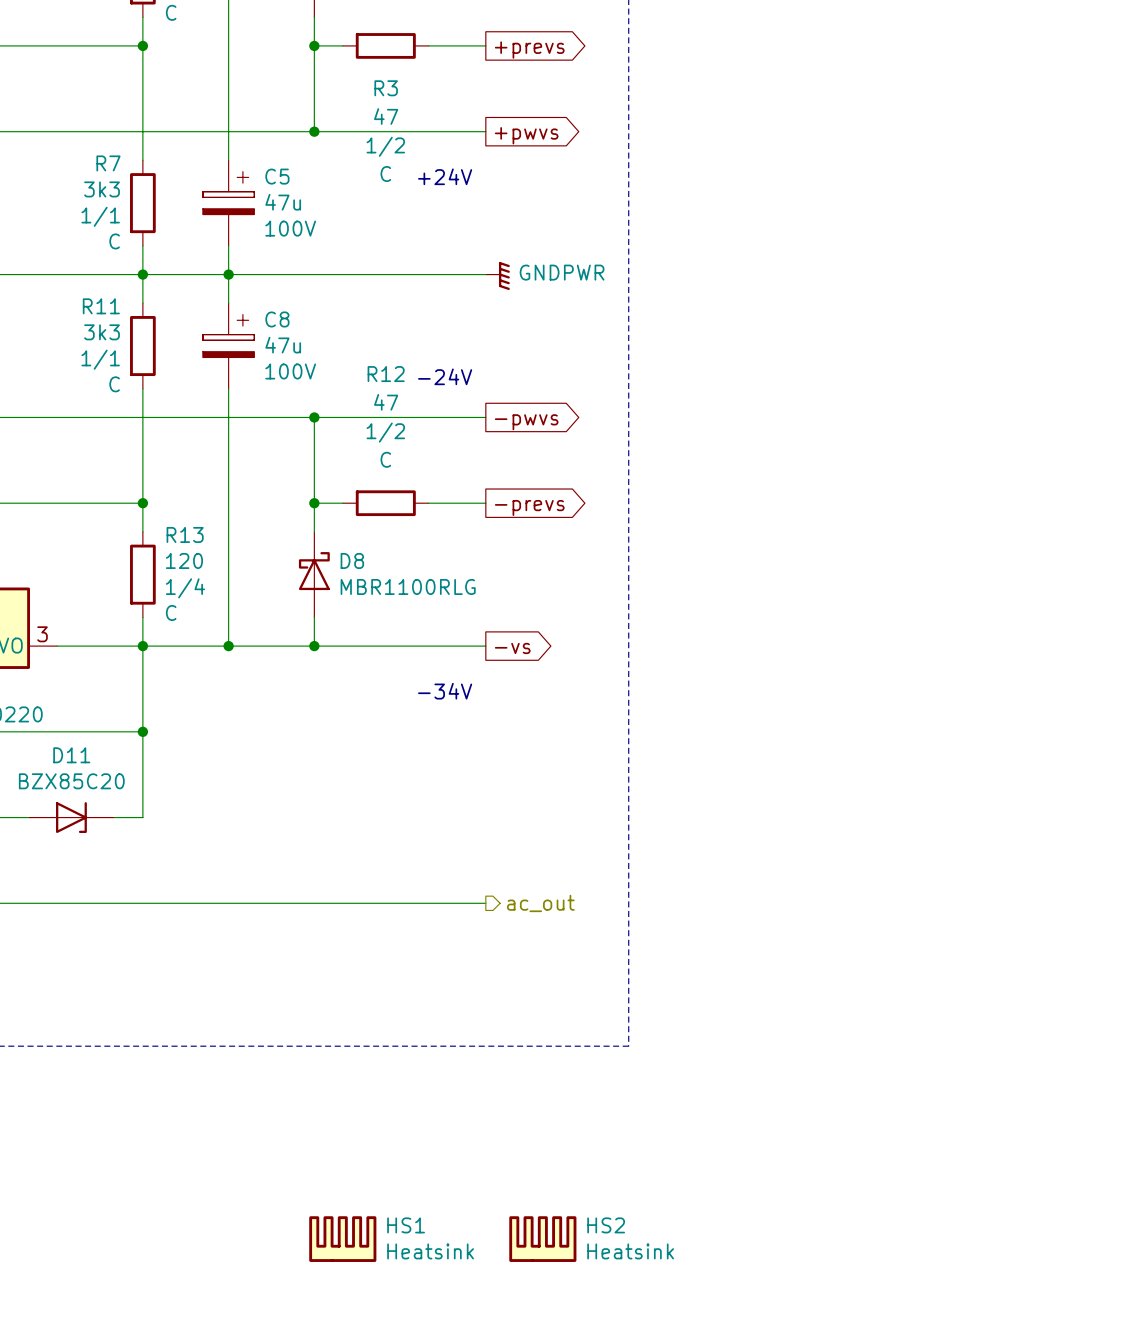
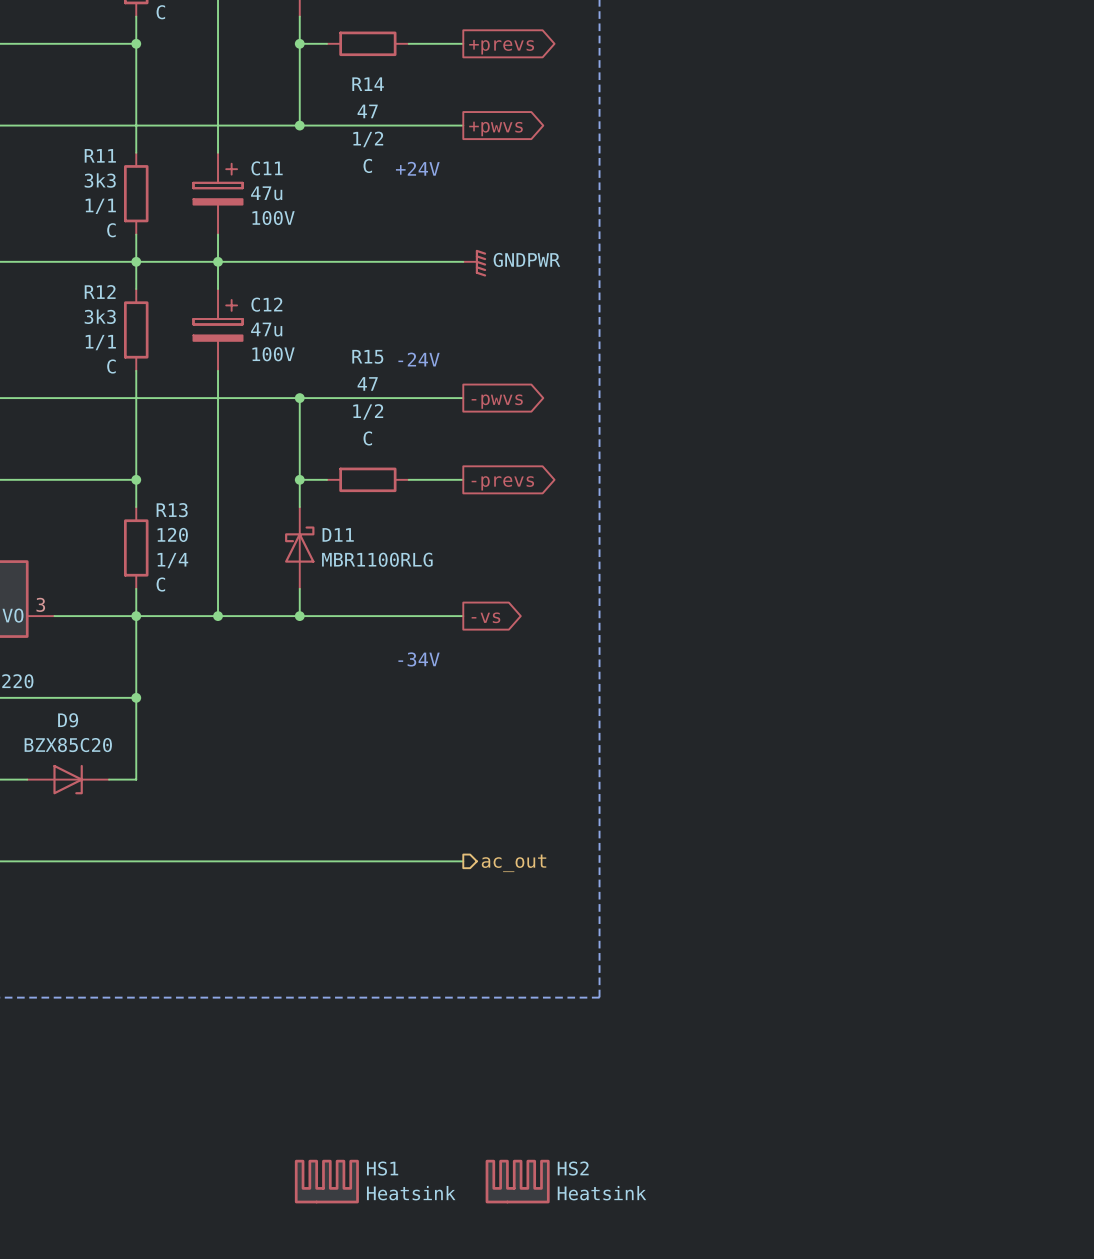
R3 name: R3 (386, 88) -> R14 (368, 84)
R7 name: R7 (108, 163) -> R11 (100, 155)
C5 name: C5 (277, 176) -> C11 (267, 168)
R11 name: R11 (101, 306) -> R12 (100, 291)
C8 name: C8 (277, 319) -> C12 (266, 304)
R12 name: R12 (386, 374) -> R15 (367, 356)
D8 name: D8 (352, 560) -> D11 (338, 534)
D11 name: D11 (71, 755) -> D9 (68, 720)

